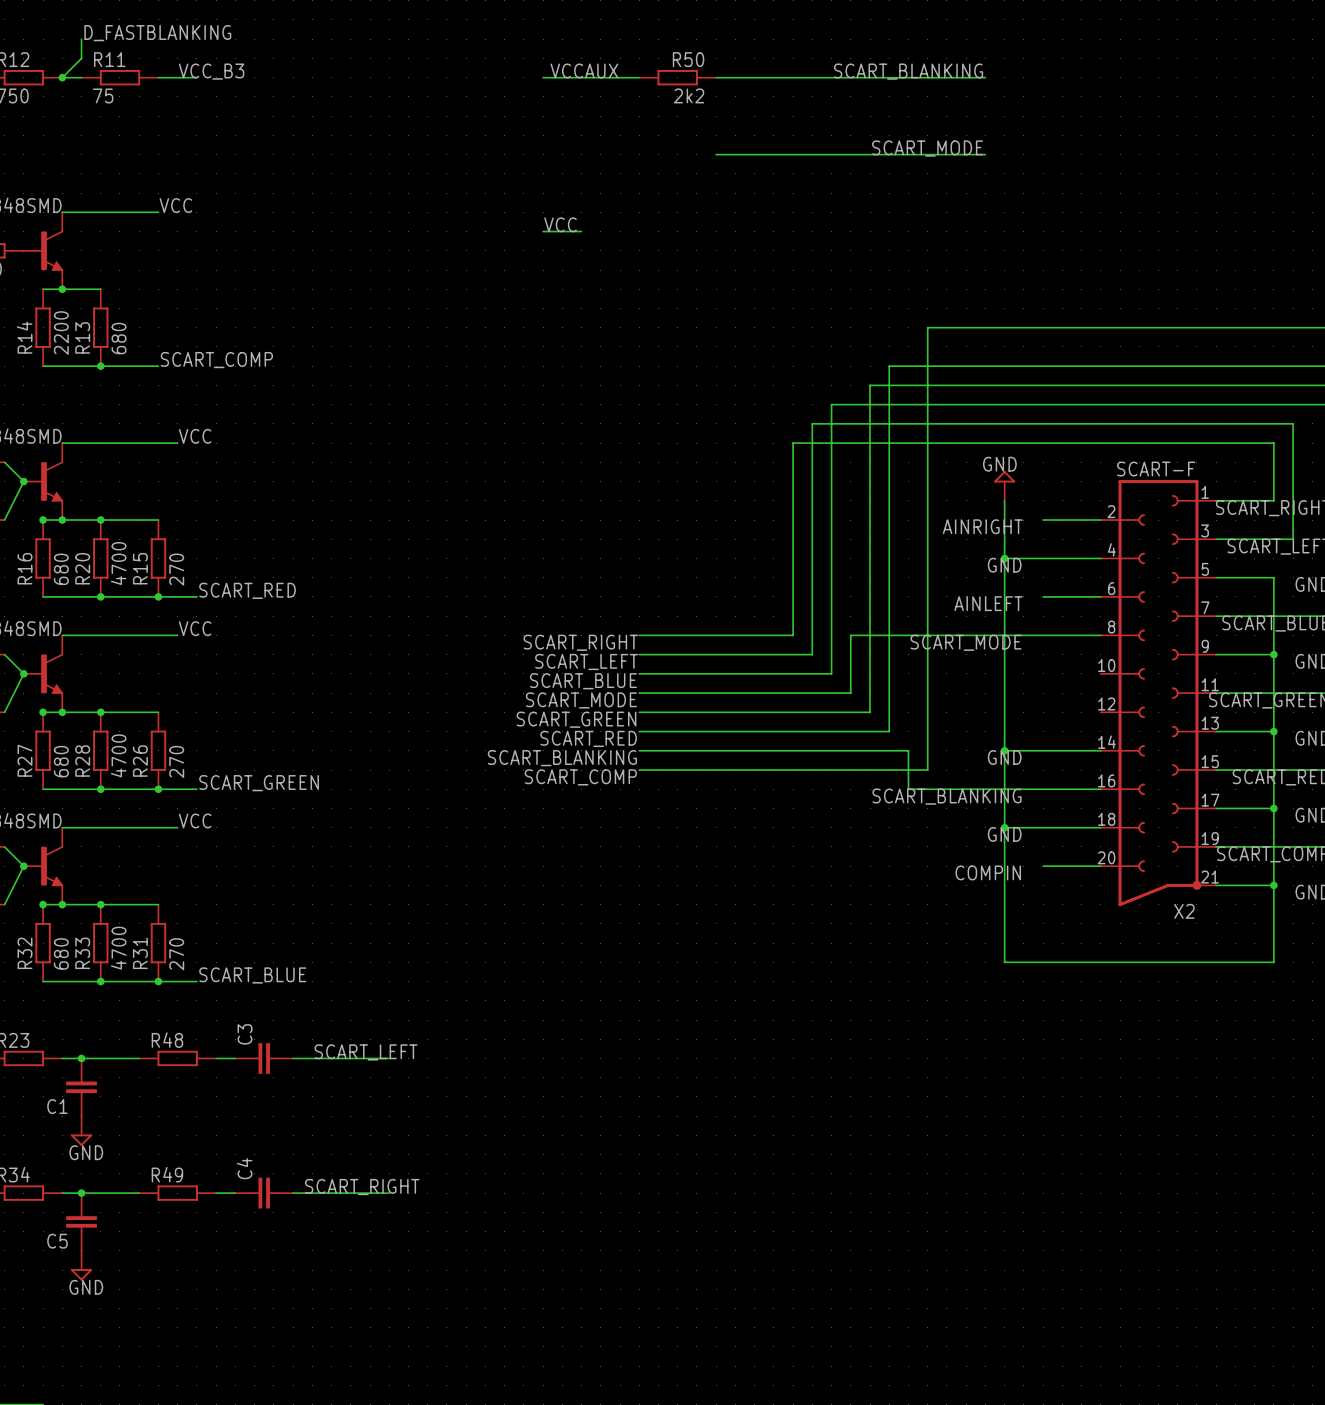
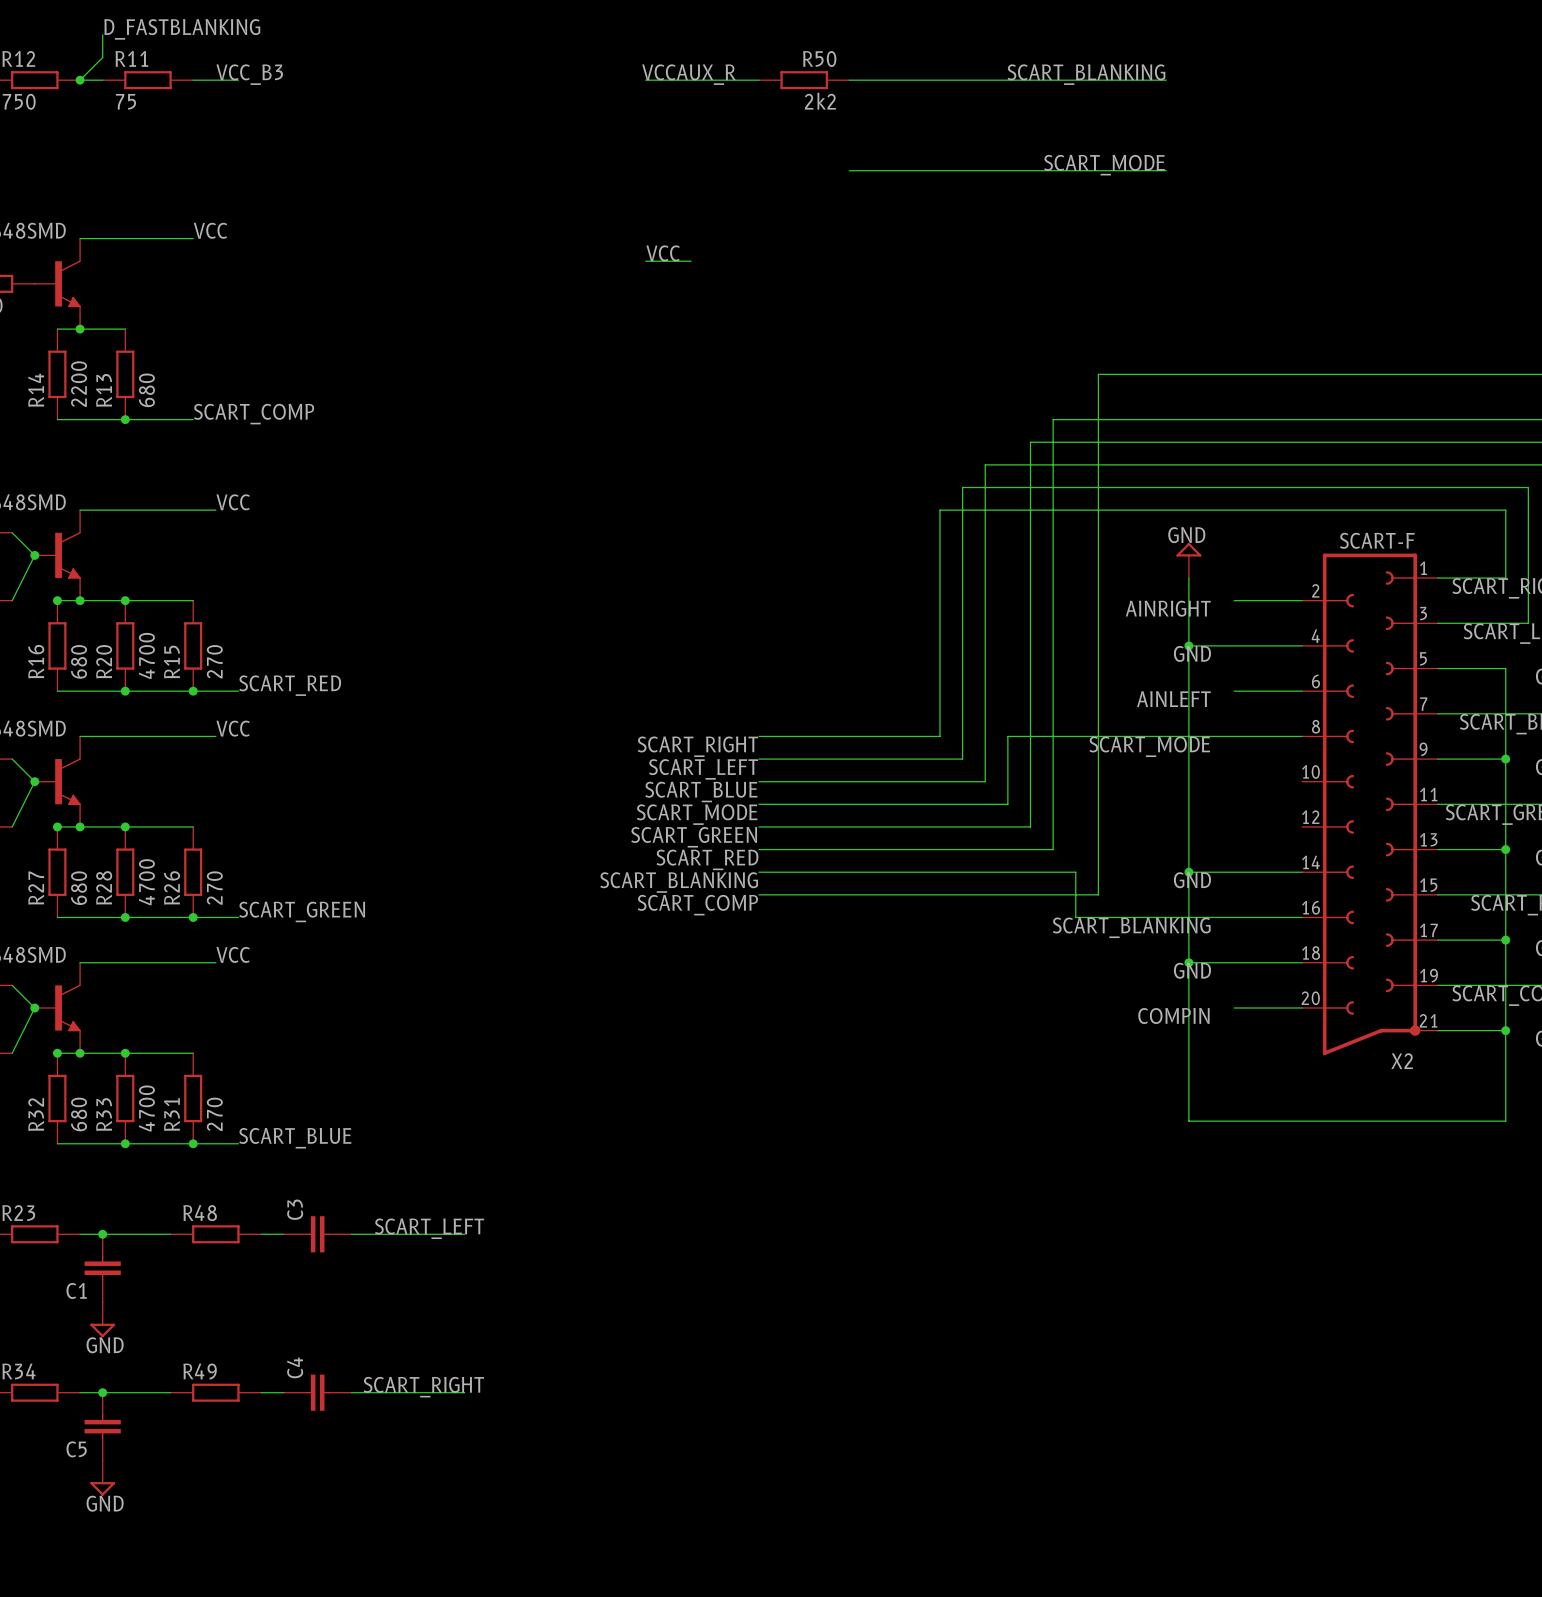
label: VCCAUX (584, 70) -> VCCAUX_R (688, 74)

